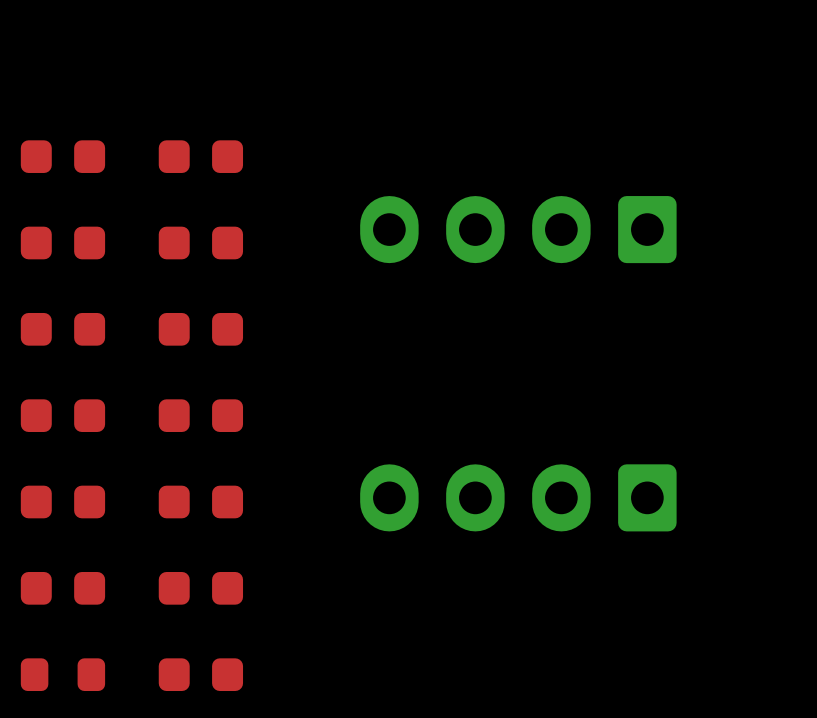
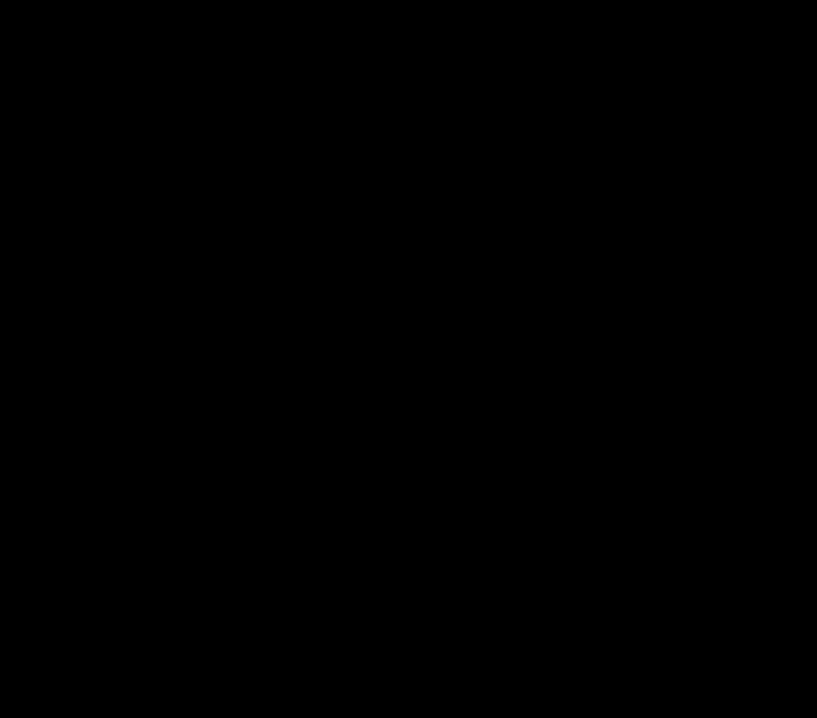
part: (62, 156) -> none
part: (200, 156) -> none
part: (518, 229) -> none
part: (62, 242) -> none
part: (200, 242) -> none
part: (62, 329) -> none
part: (200, 329) -> none
part: (62, 415) -> none
part: (200, 415) -> none
part: (518, 497) -> none
part: (62, 501) -> none
part: (200, 501) -> none
part: (62, 588) -> none
part: (200, 588) -> none
part: (62, 674) -> none
part: (200, 674) -> none

